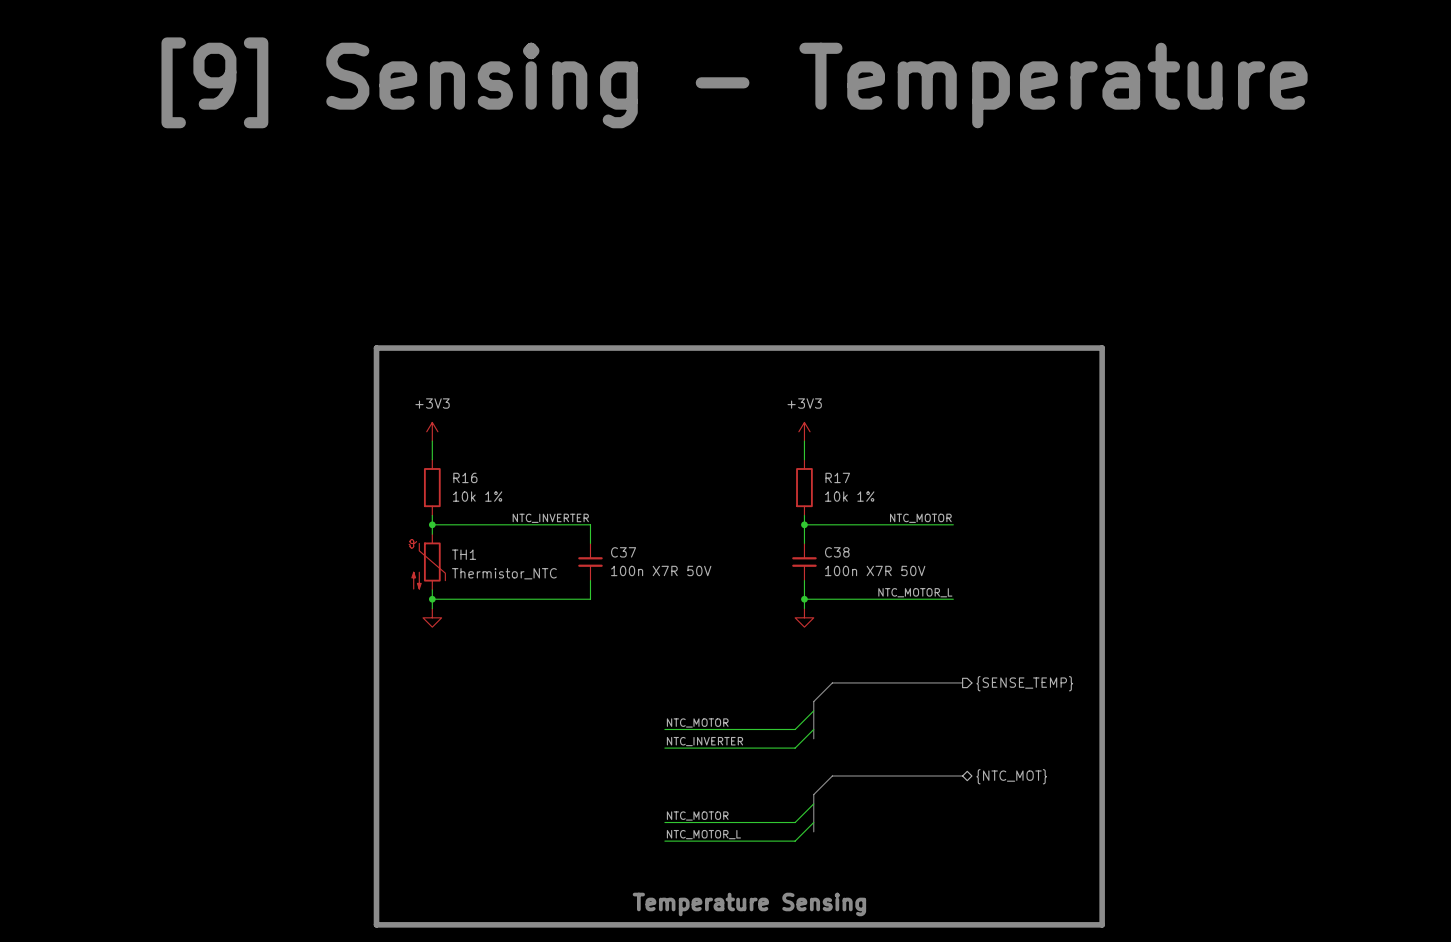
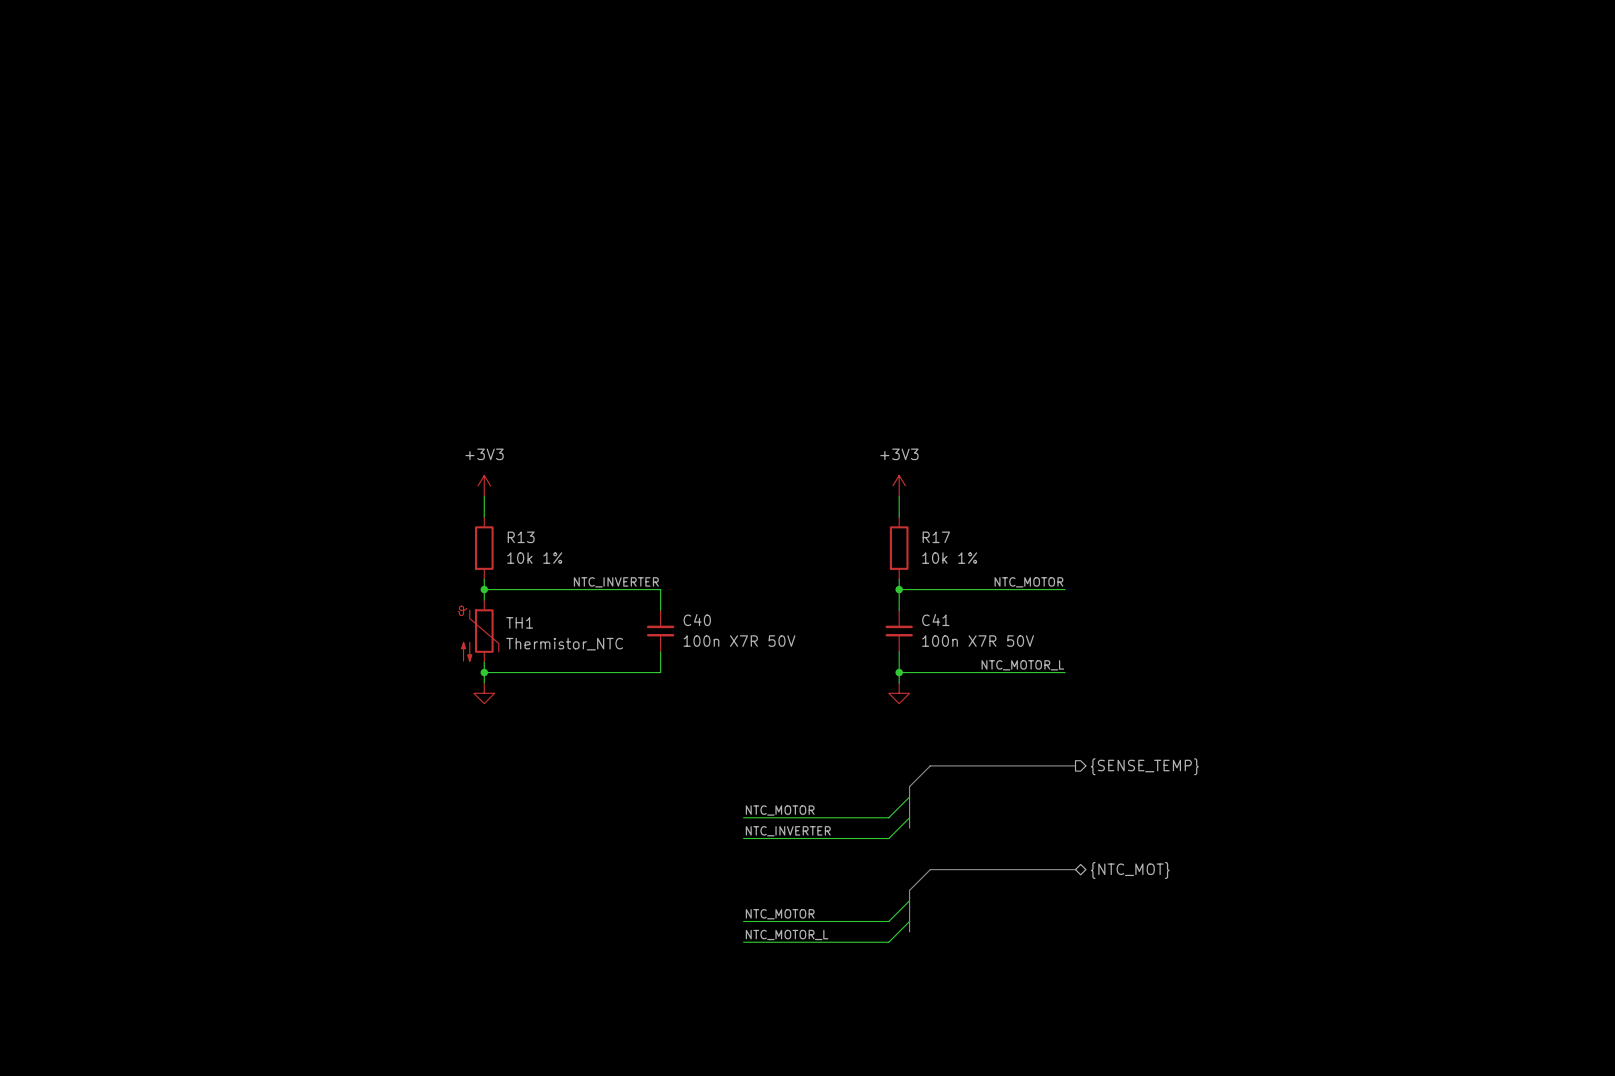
text: [9] Sensing - Temperature (734, 82) -> none
line: (376, 348) (1102, 348) (1102, 924) (376, 924) (376, 348) -> none
R16 name: R16 (465, 477) -> R13 (521, 537)
C37 name: C37 (623, 552) -> C40 (697, 620)
C38 name: C38 (837, 552) -> C41 (935, 620)
text: Temperature Sensing (749, 904) -> none

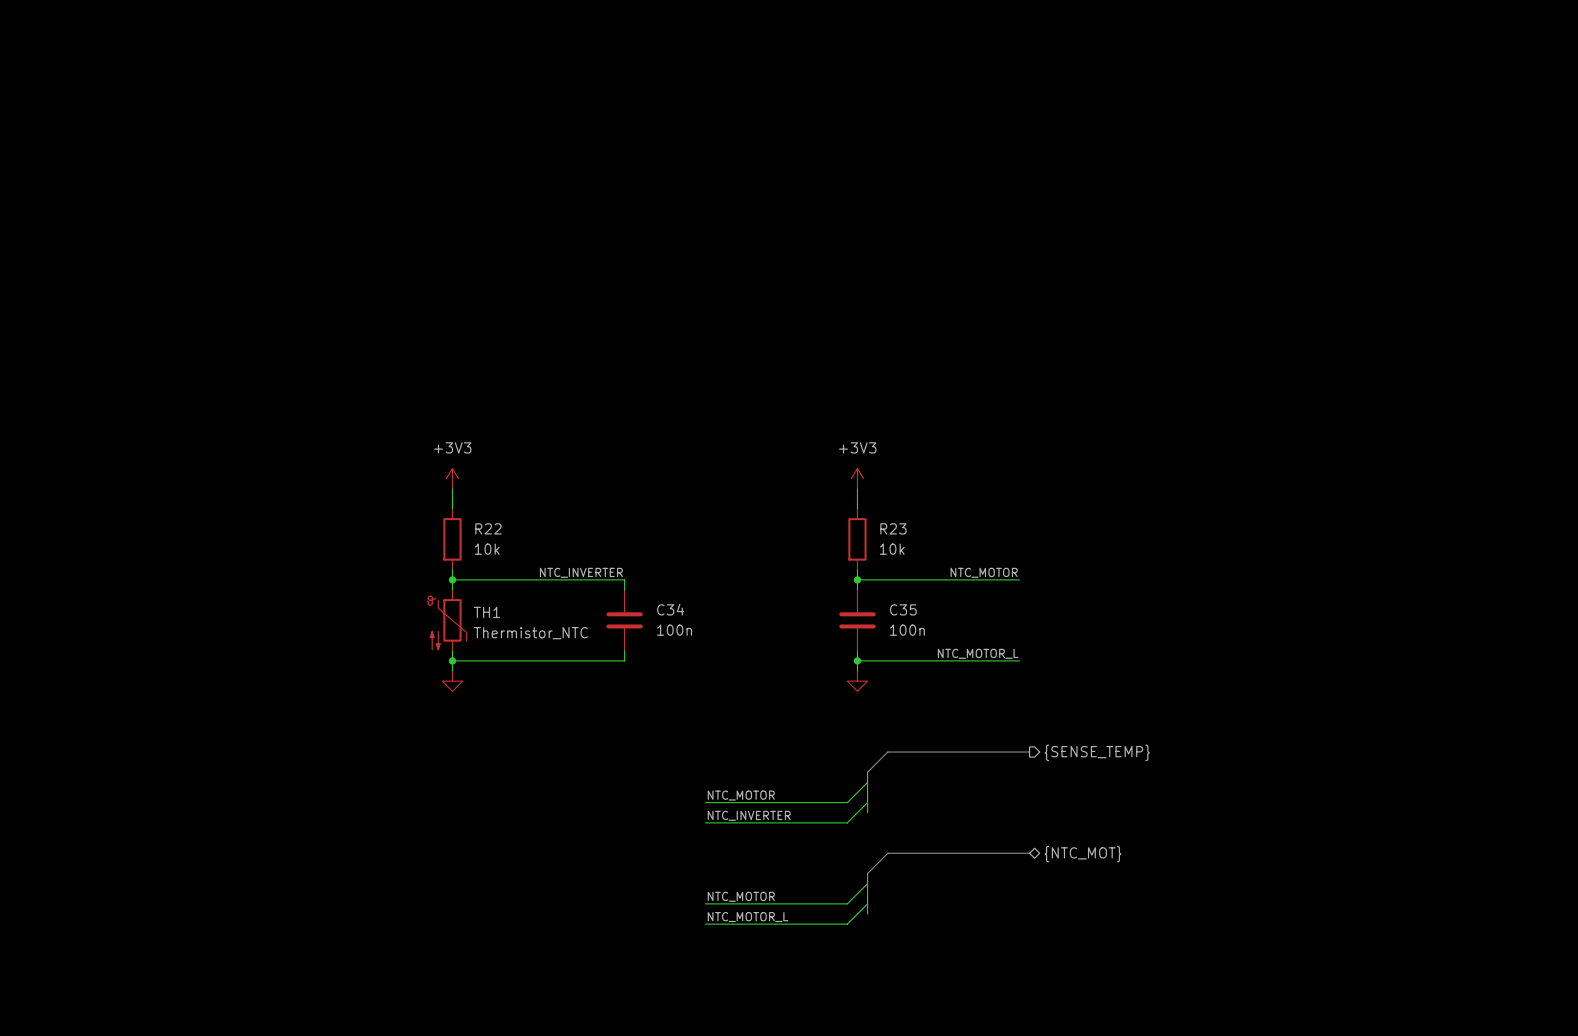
R13 name: R13 (521, 537) -> R22 (488, 528)
R17 name: R17 (936, 537) -> R23 (893, 528)
R13 value: 10k 1% (534, 558) -> 10k (487, 549)
R17 value: 10k 1% (949, 558) -> 10k (892, 549)
C40: 100n X7R 50V (660, 631) -> none
C34: none -> 100n (624, 620)
C41: 100n X7R 50V (899, 631) -> none
C35: none -> 100n (857, 620)

